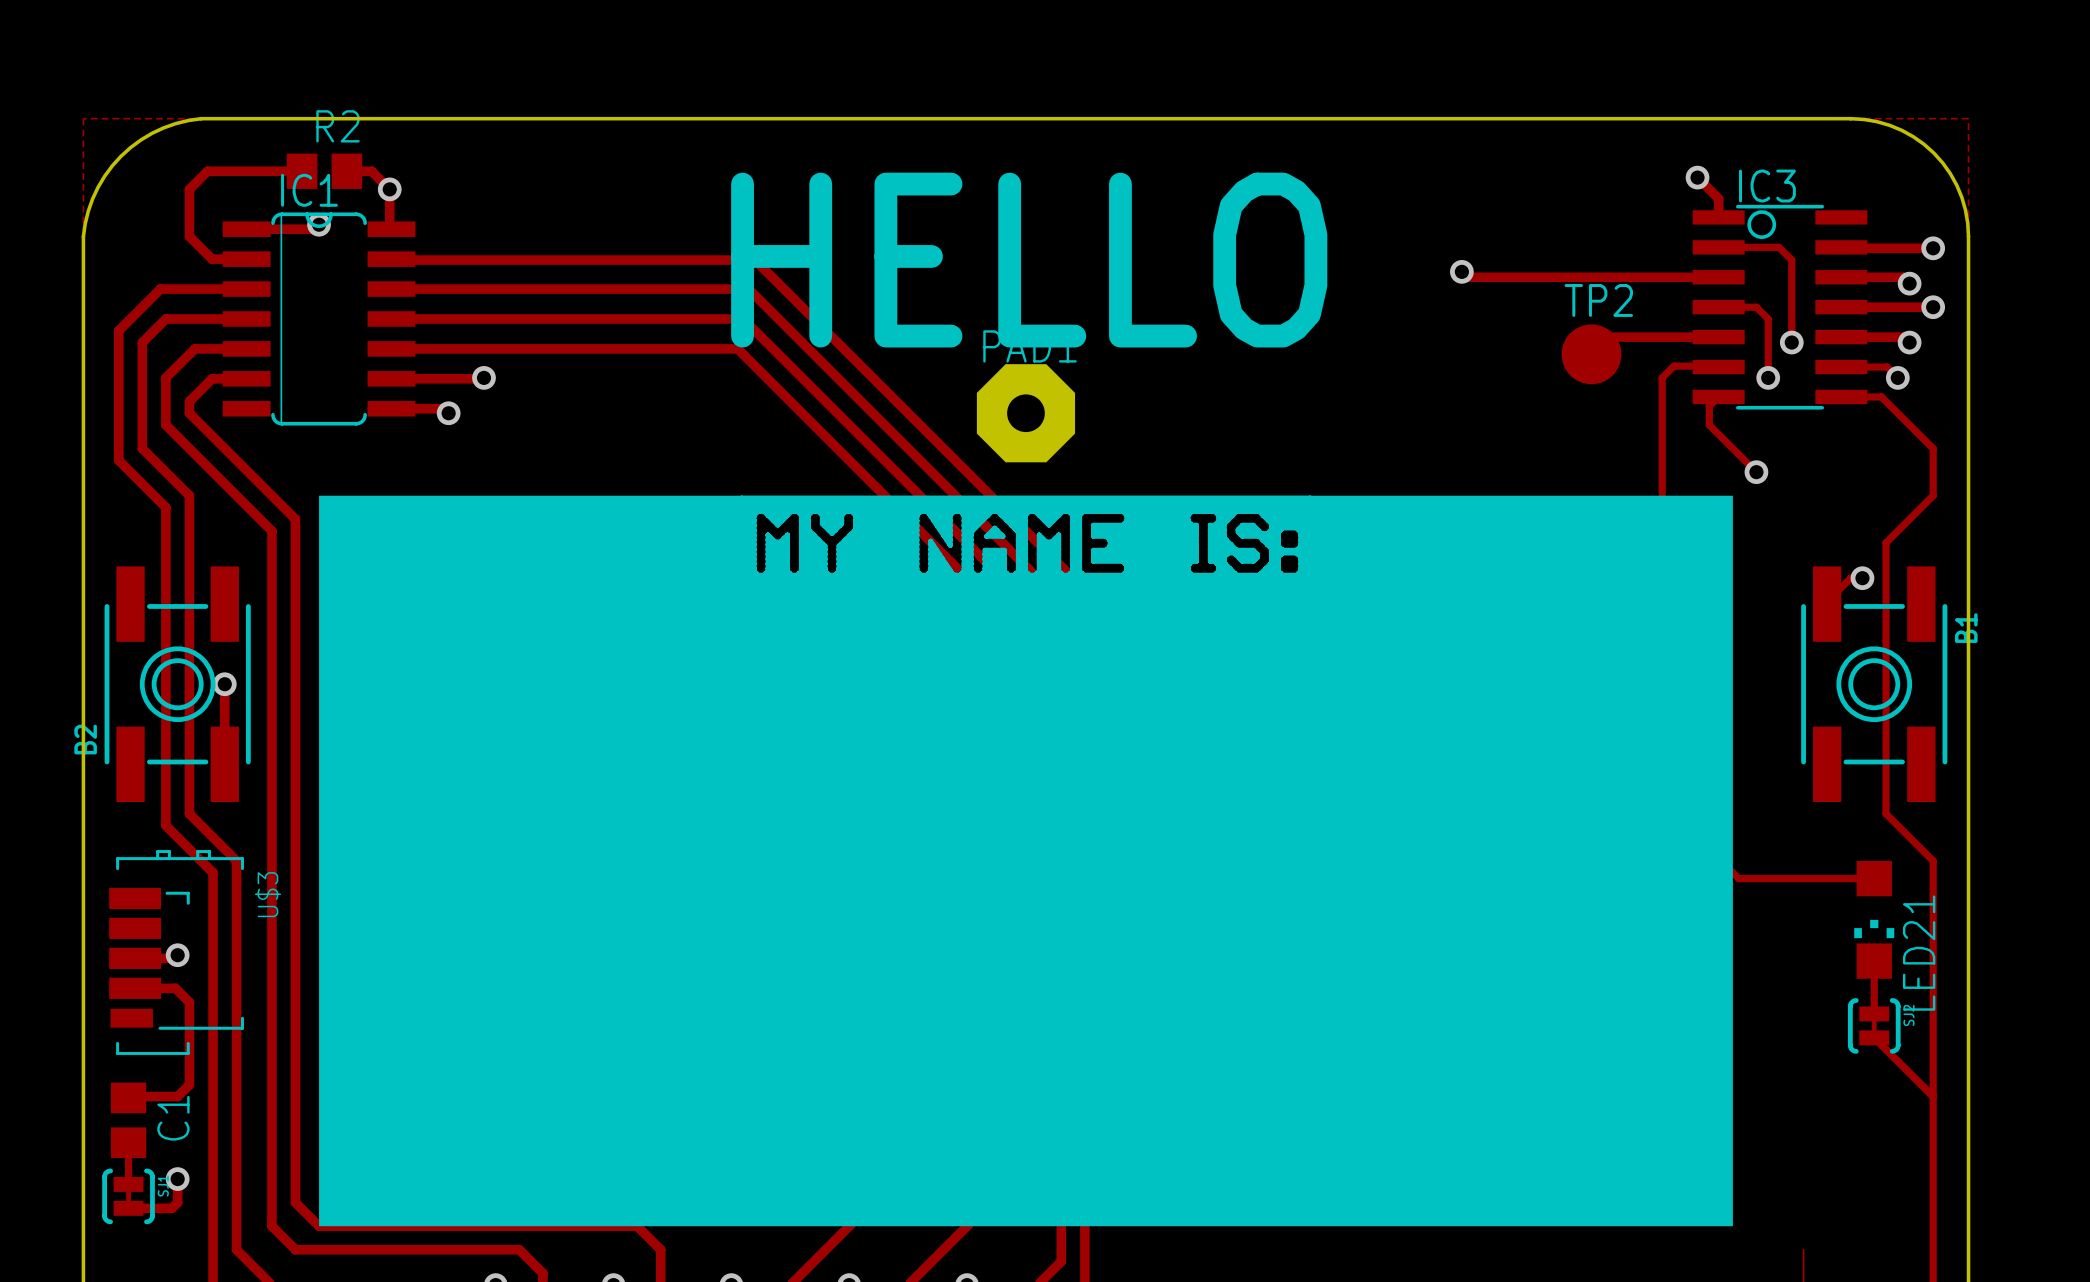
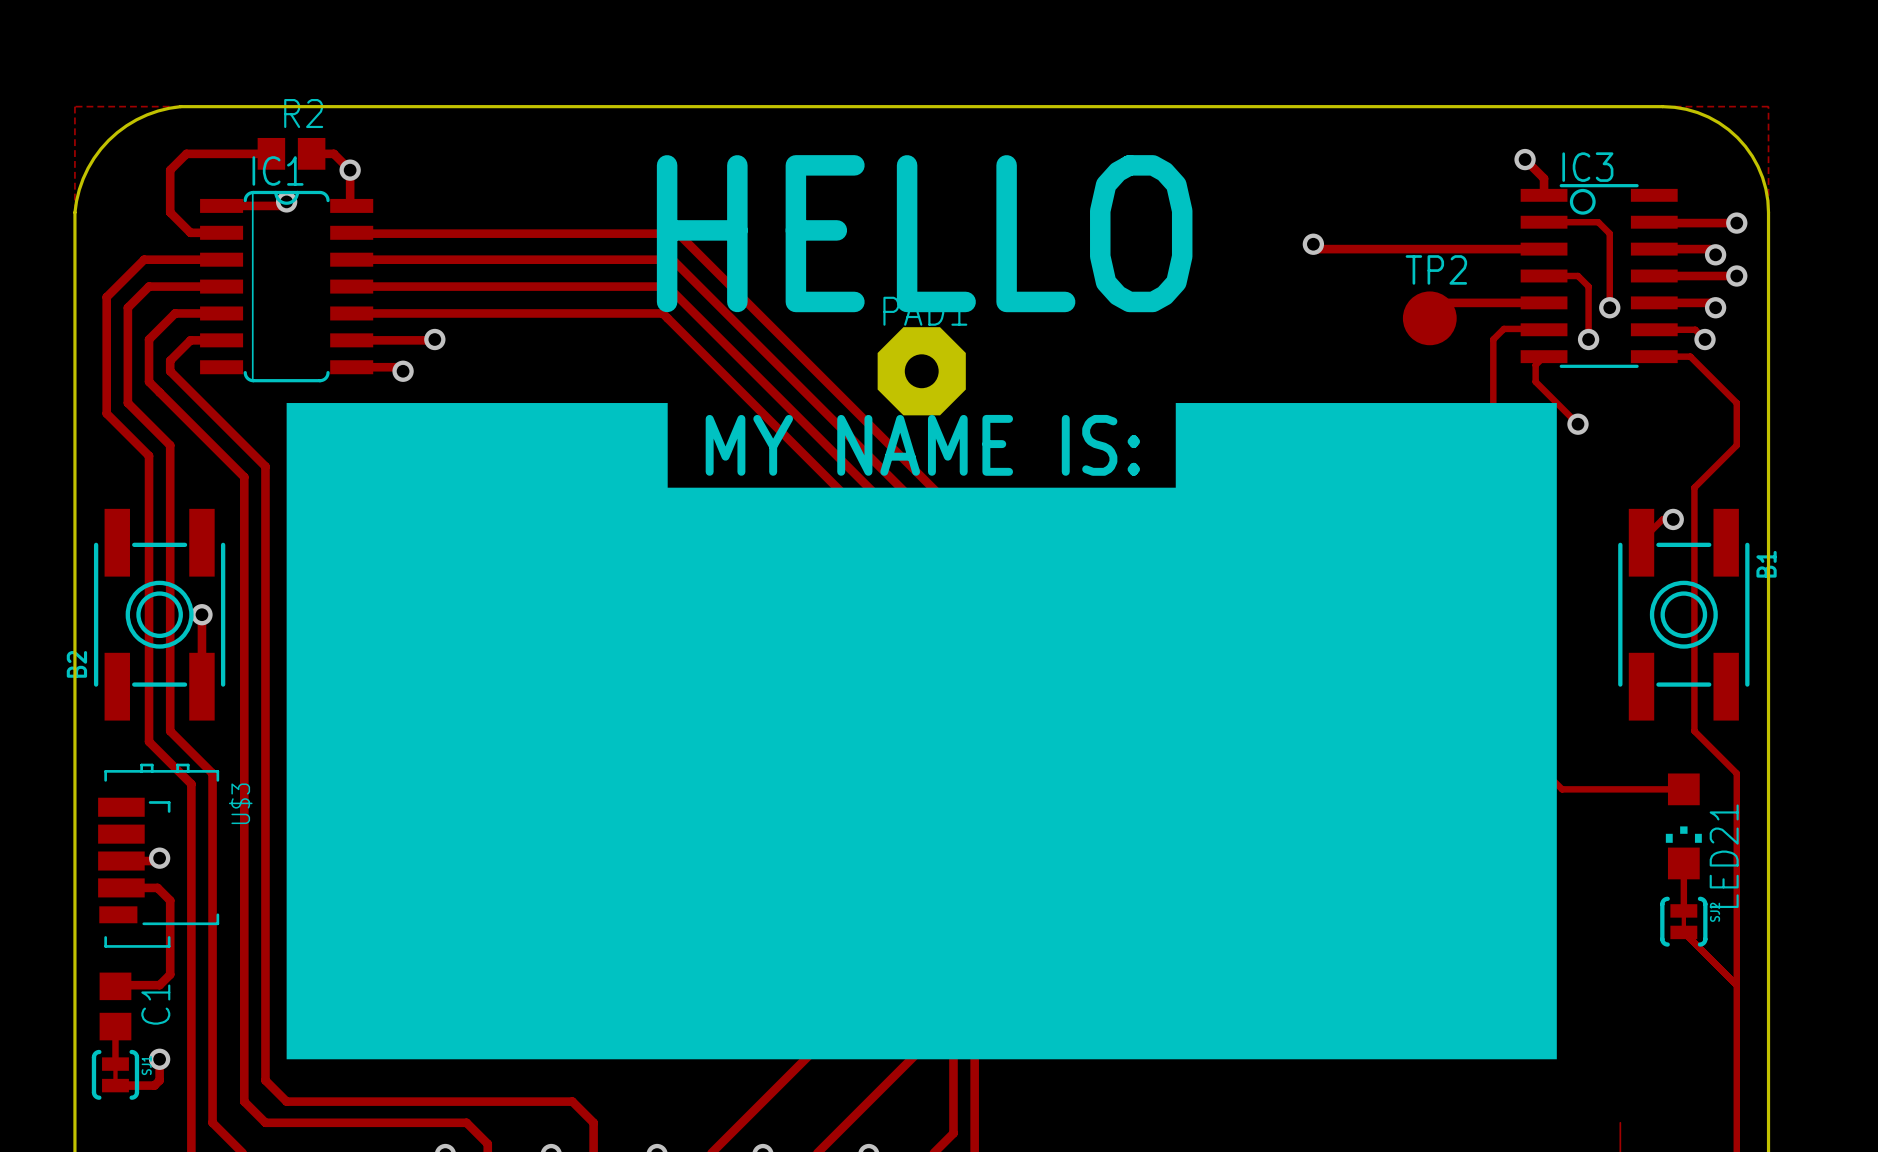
drawing: [739, 495, 1313, 591] -> none
text: none -> MY NAME IS: (922, 445)
drawing position: (1025, 860) -> (921, 731)

